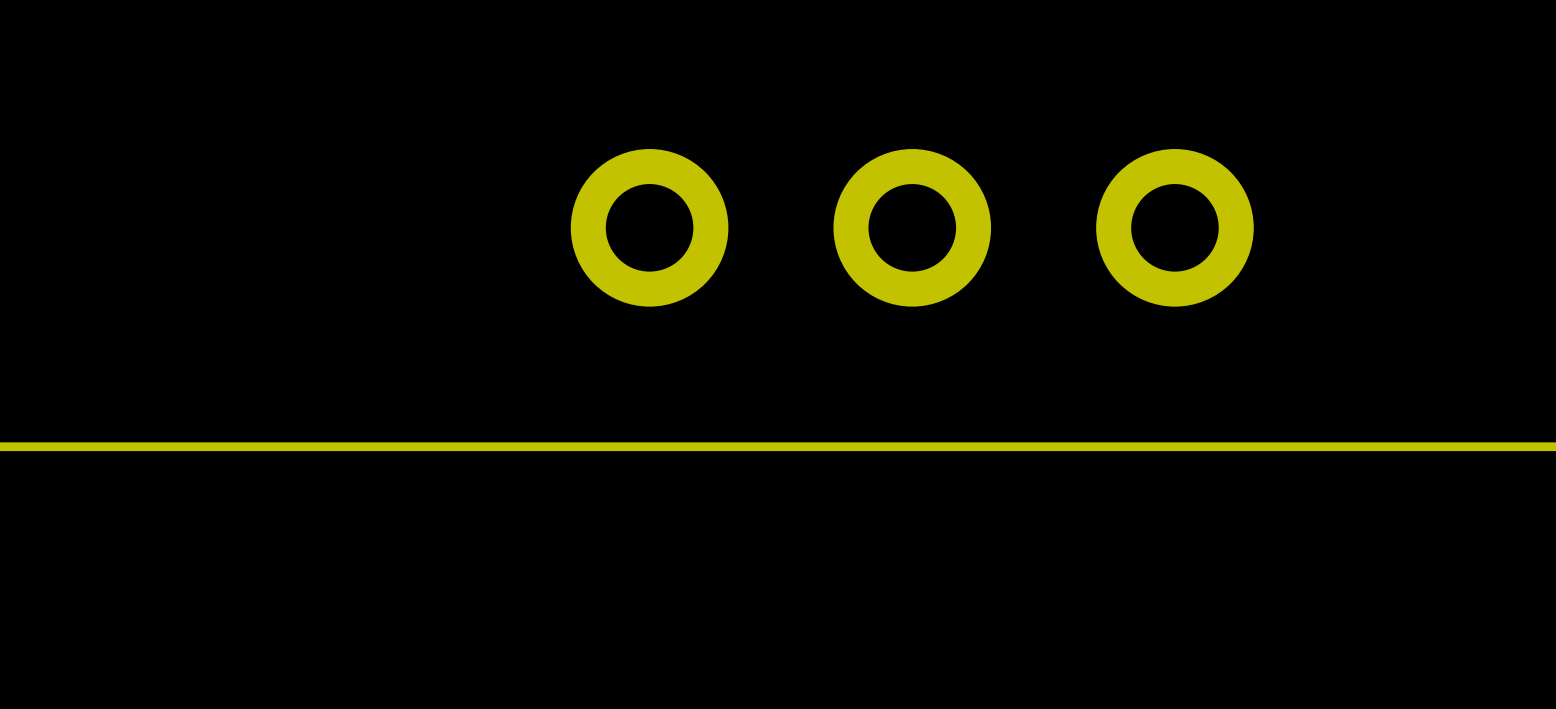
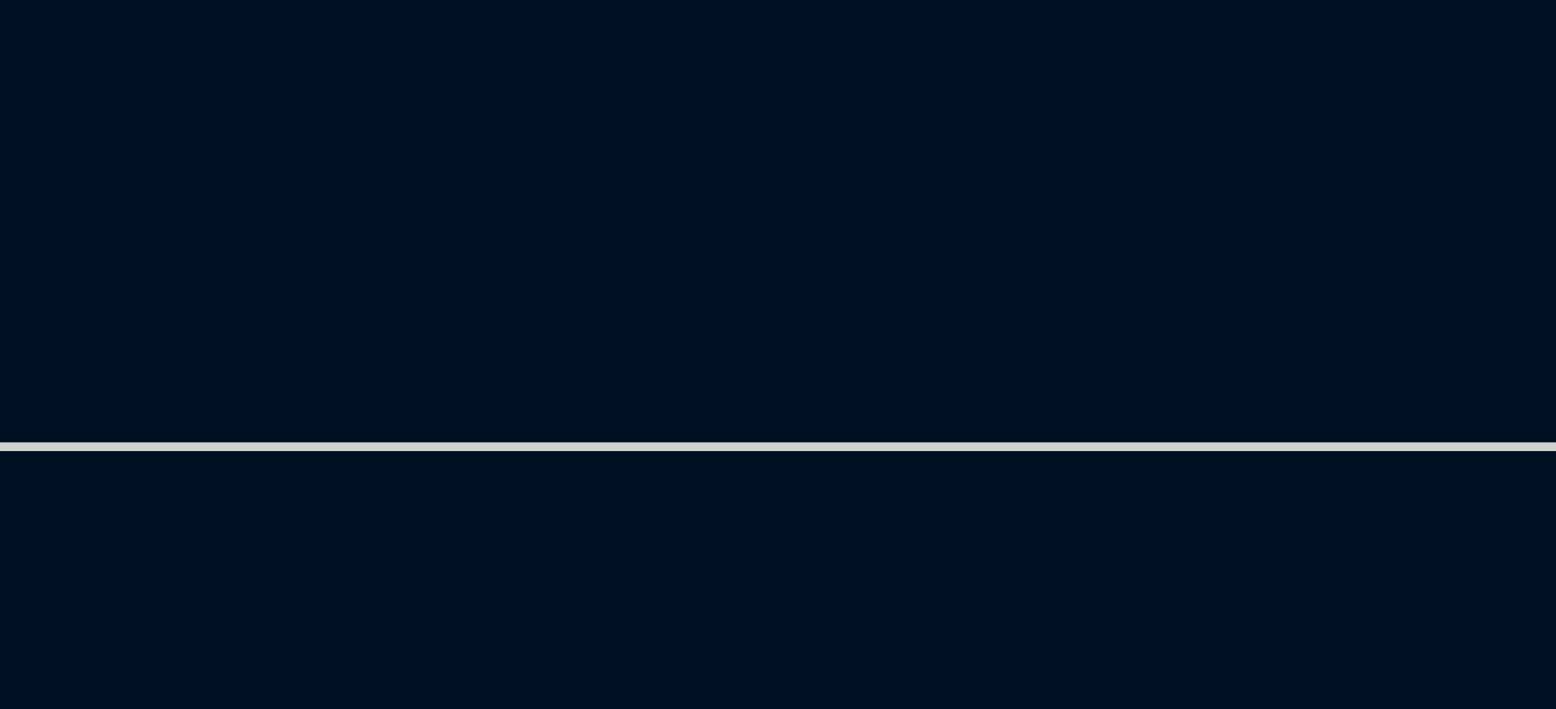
part: (649, 227) -> none
part: (912, 227) -> none
part: (1174, 227) -> none

